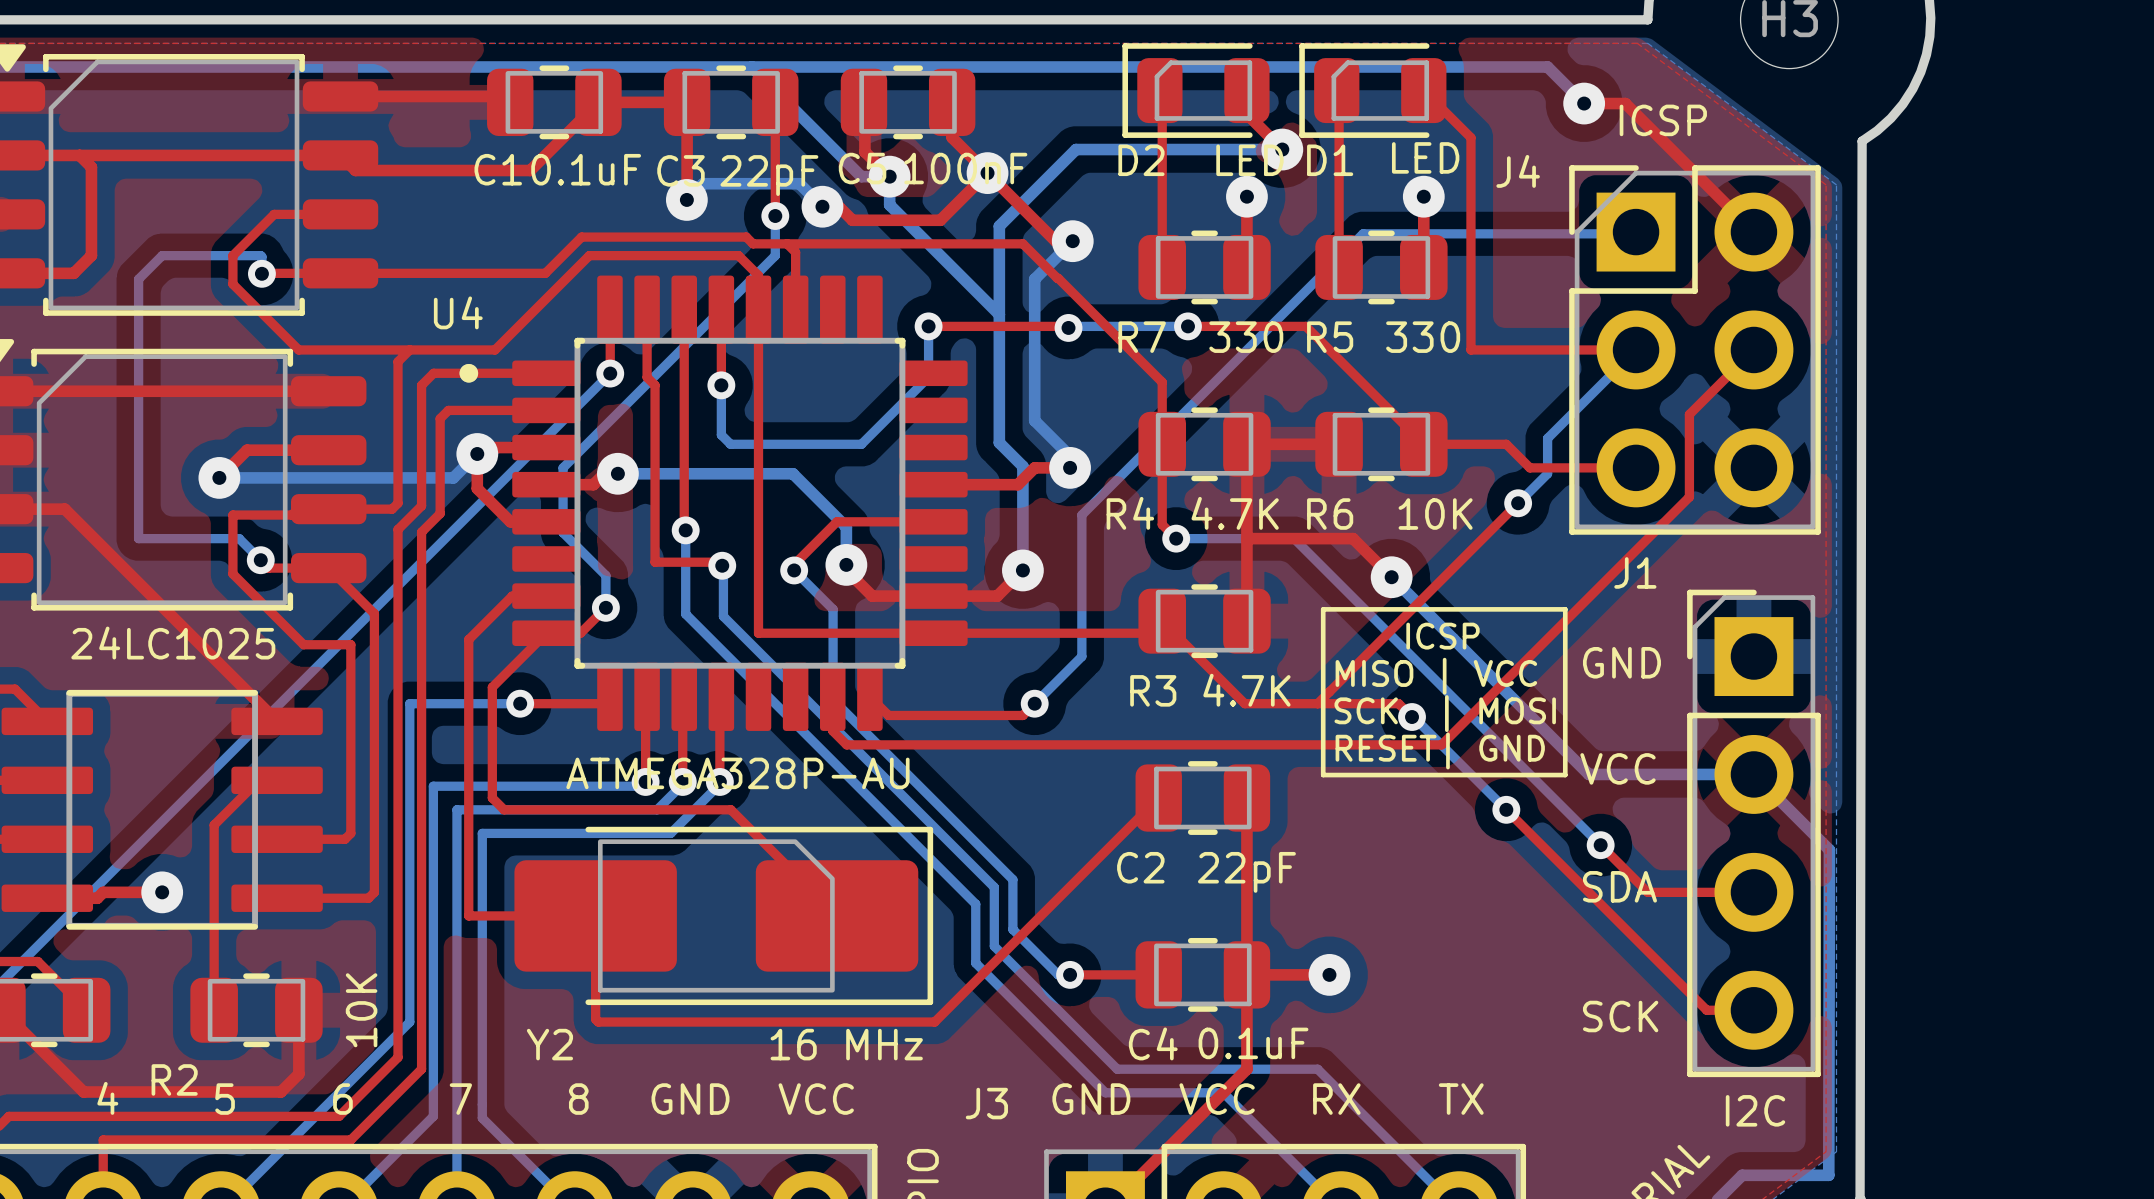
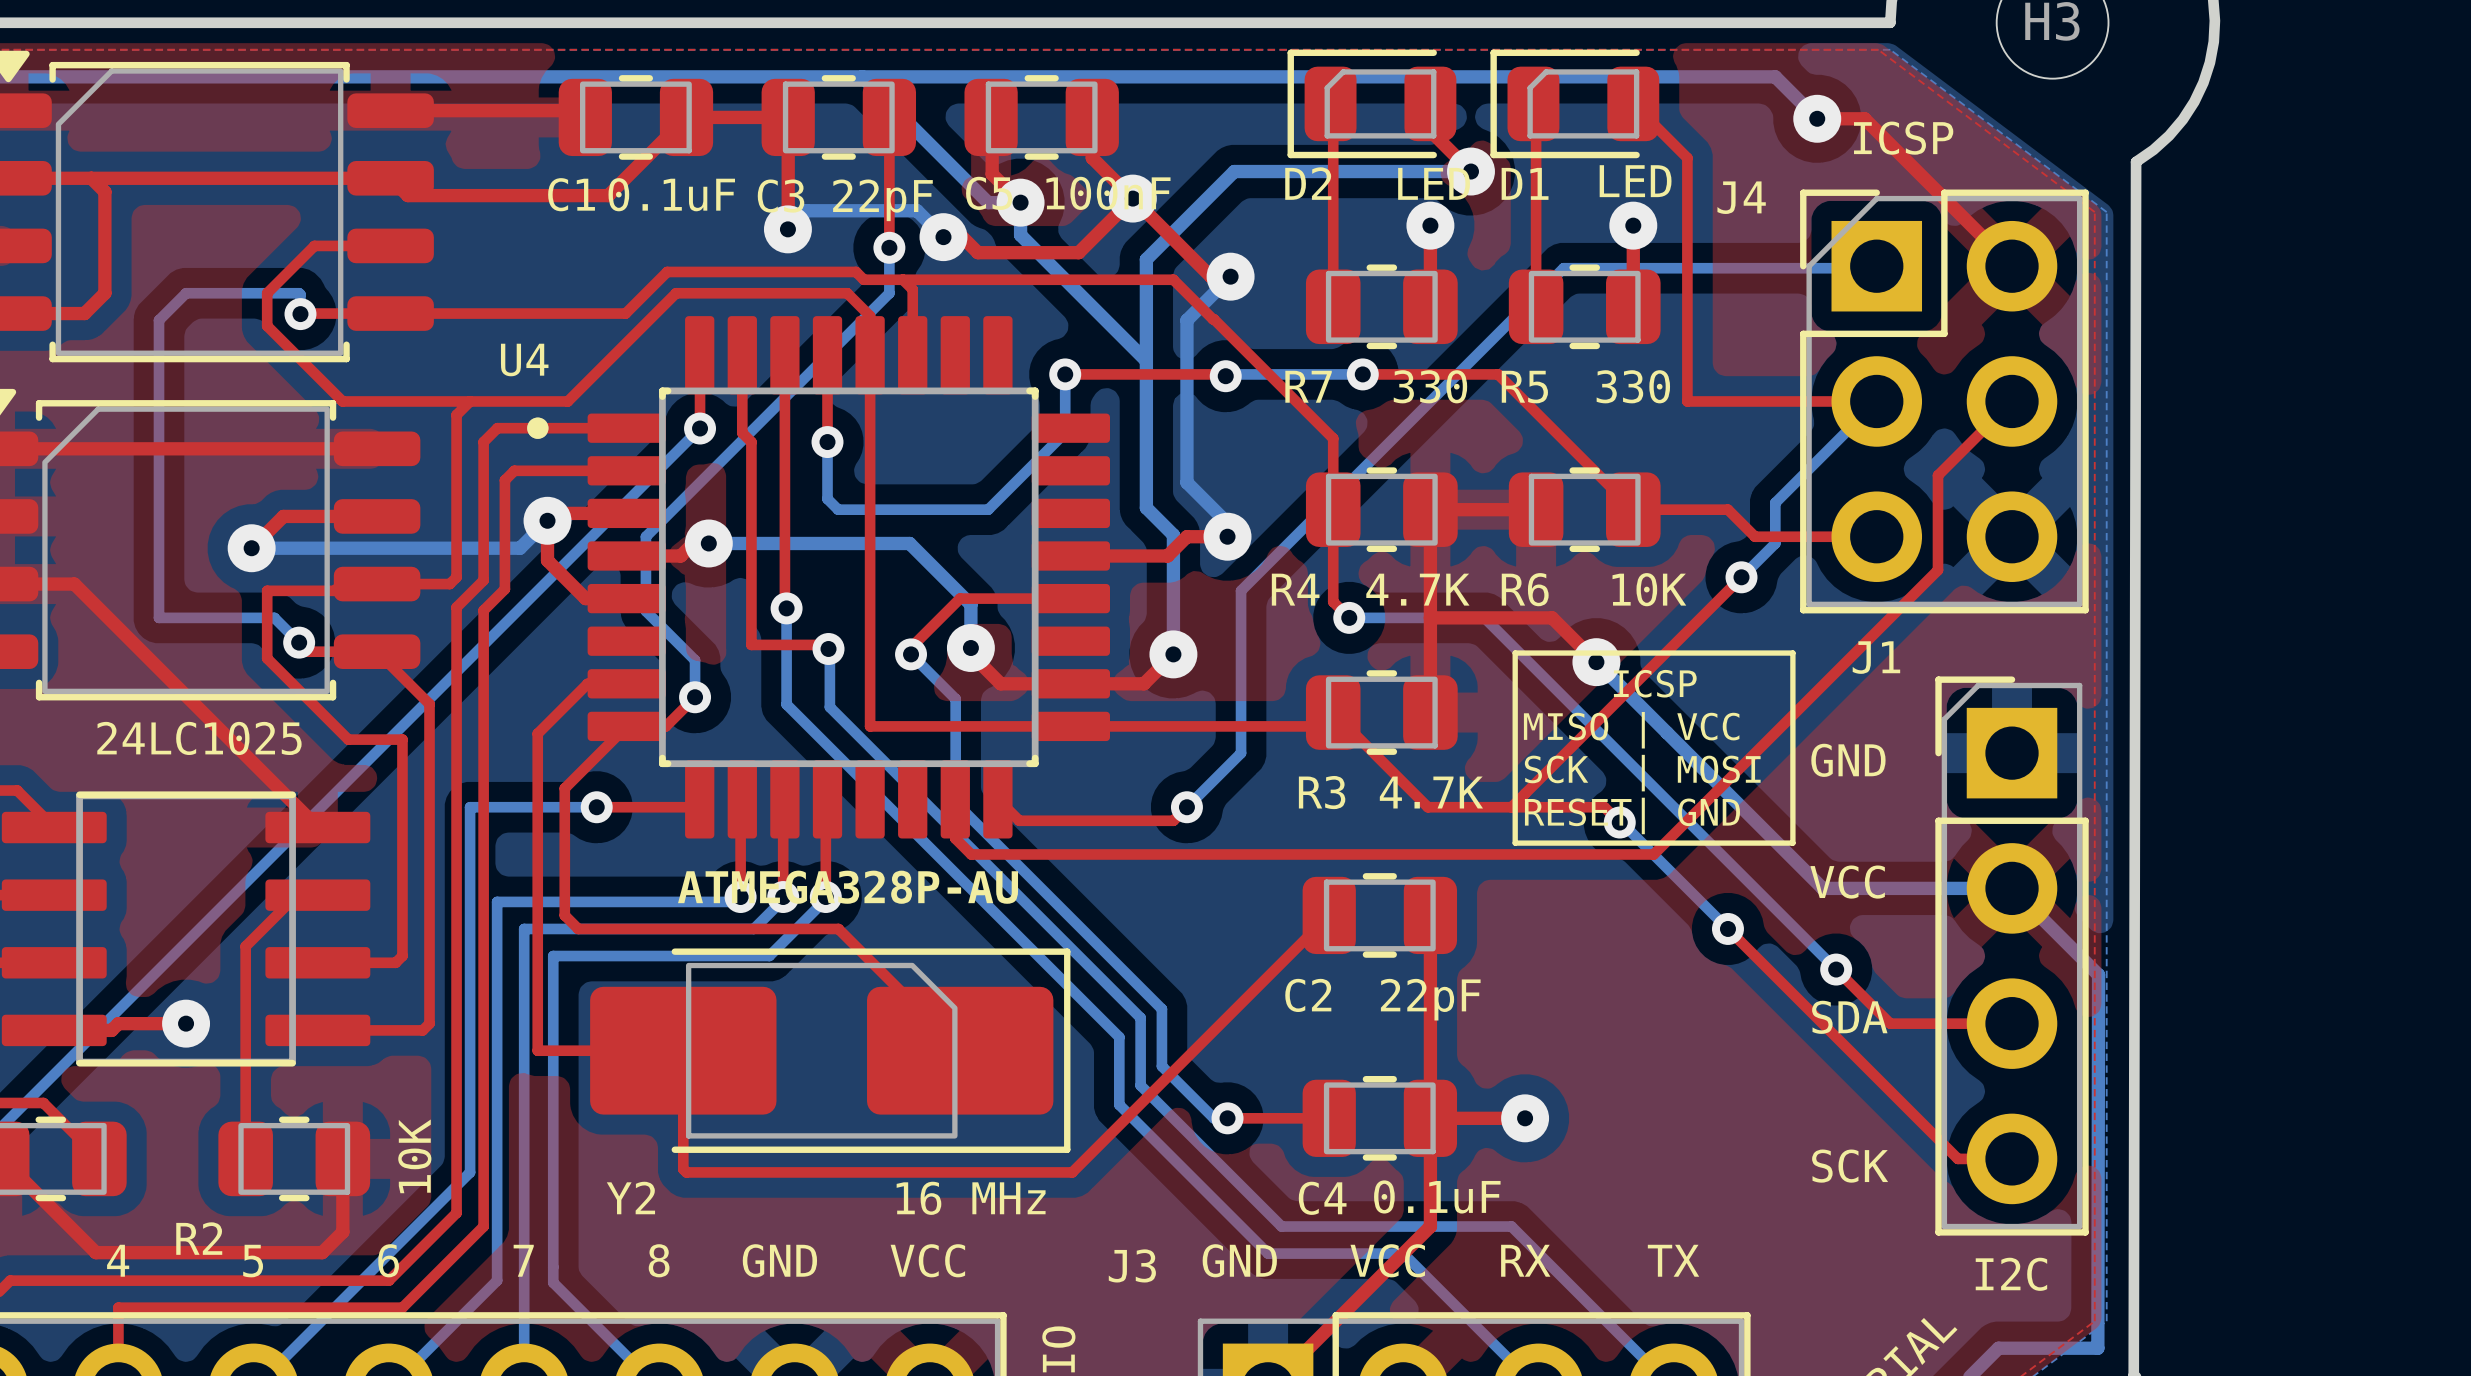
line: (1323, 609) (1565, 609) (1565, 775) (1323, 775) (1323, 609) -> (1515, 653) (1515, 843) (1792, 843) (1792, 653) (1515, 653)
text position: ICSP (1443, 636) -> ICSP (1655, 683)
text position: MISO | VCC (1436, 676) -> MISO | VCC (1631, 730)
text position: SCK | MOSI (1445, 713) -> SCK | MOSI (1642, 773)
text position: RESET| GND (1440, 750) -> RESET| GND (1632, 815)

